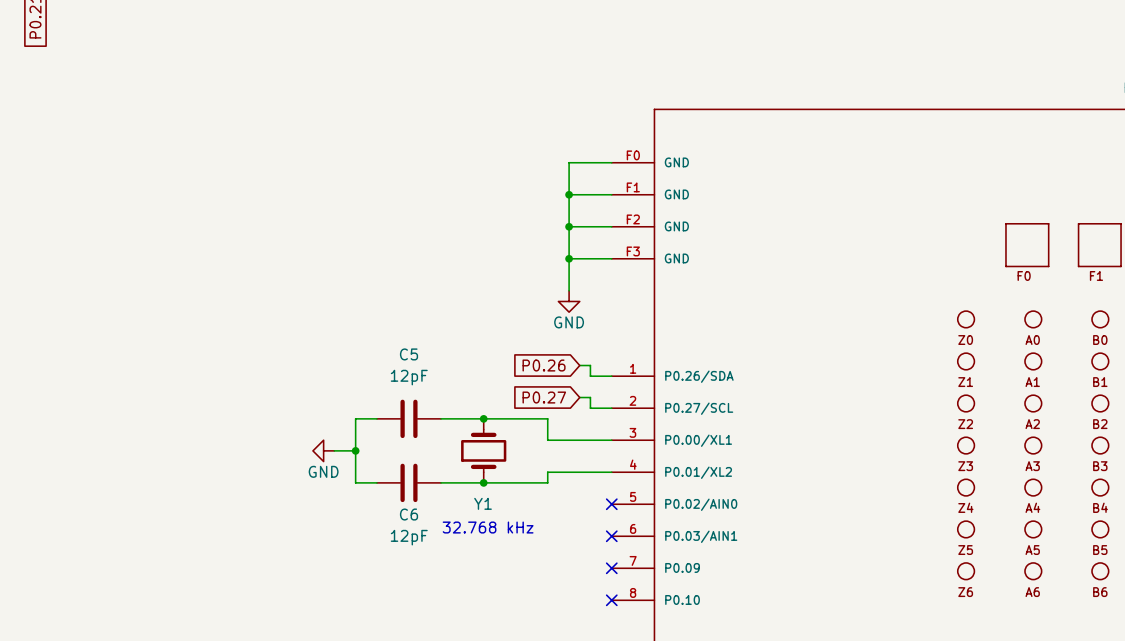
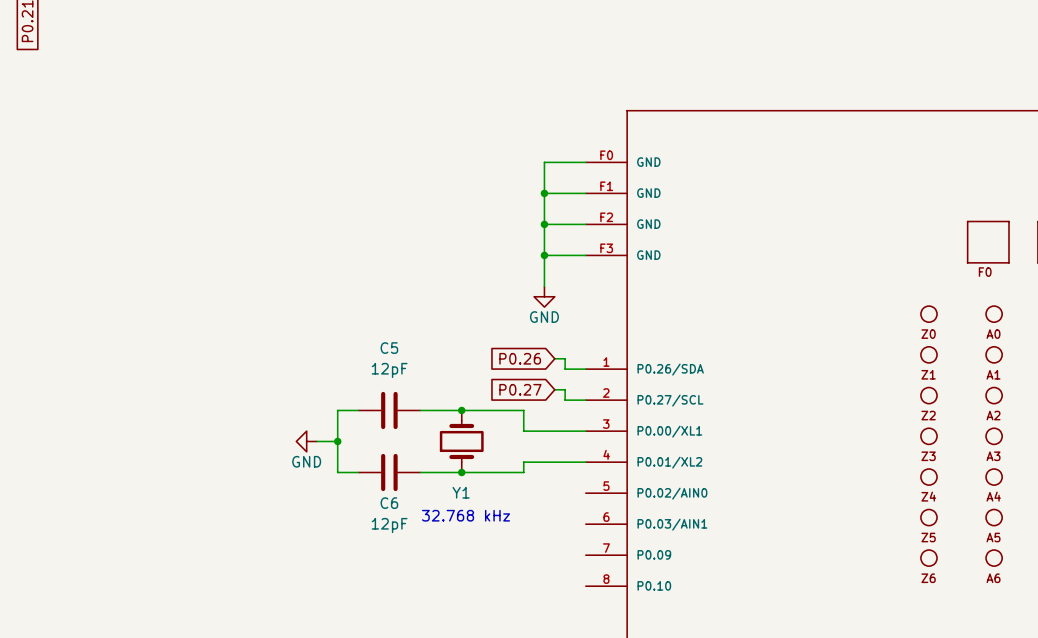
no-connect mark: (611, 504) -> none
no-connect mark: (611, 536) -> none
no-connect mark: (611, 568) -> none
no-connect mark: (611, 600) -> none

